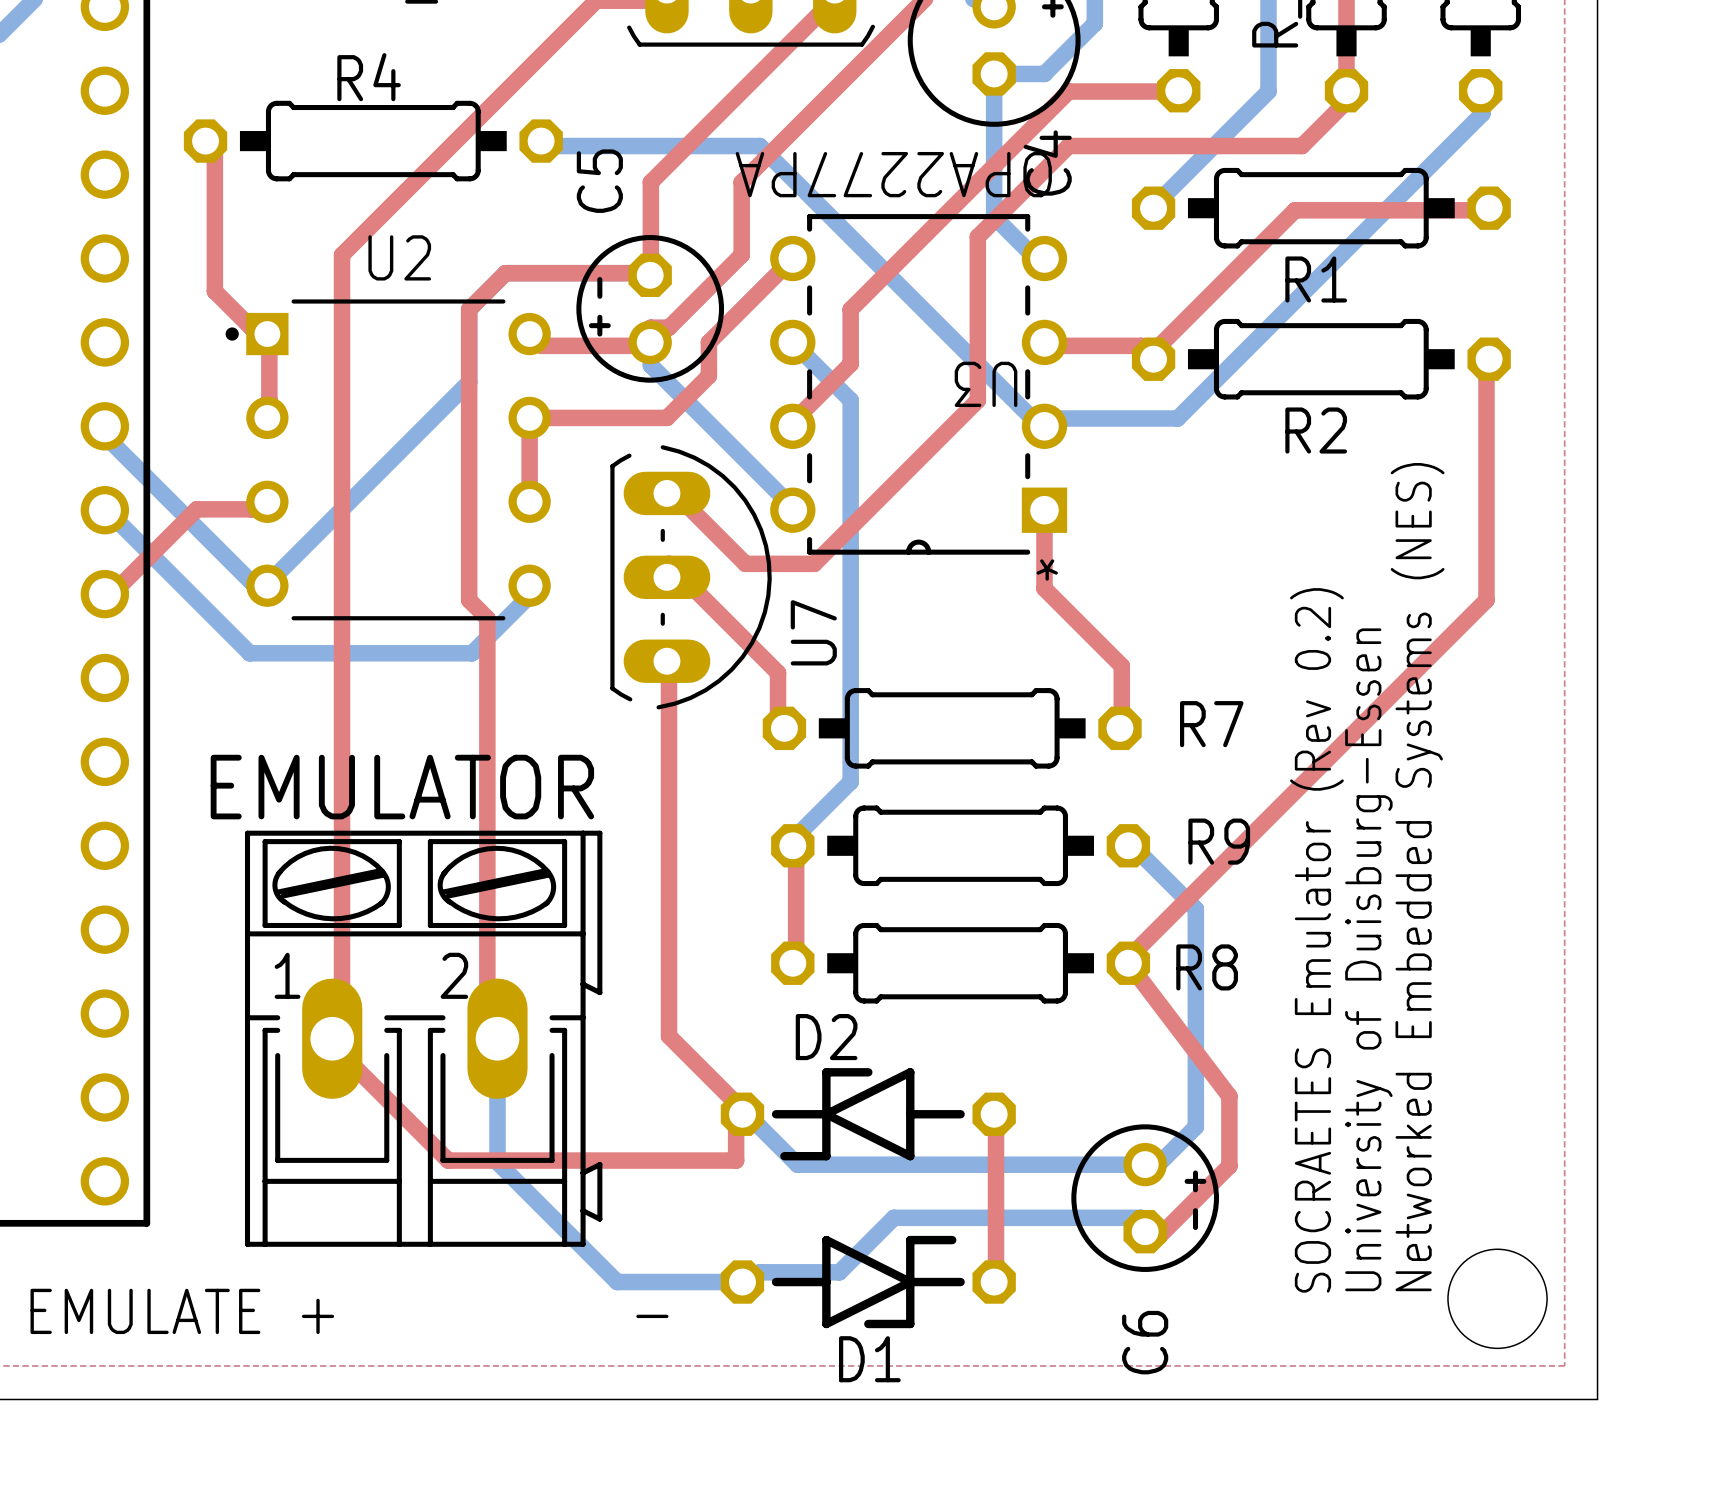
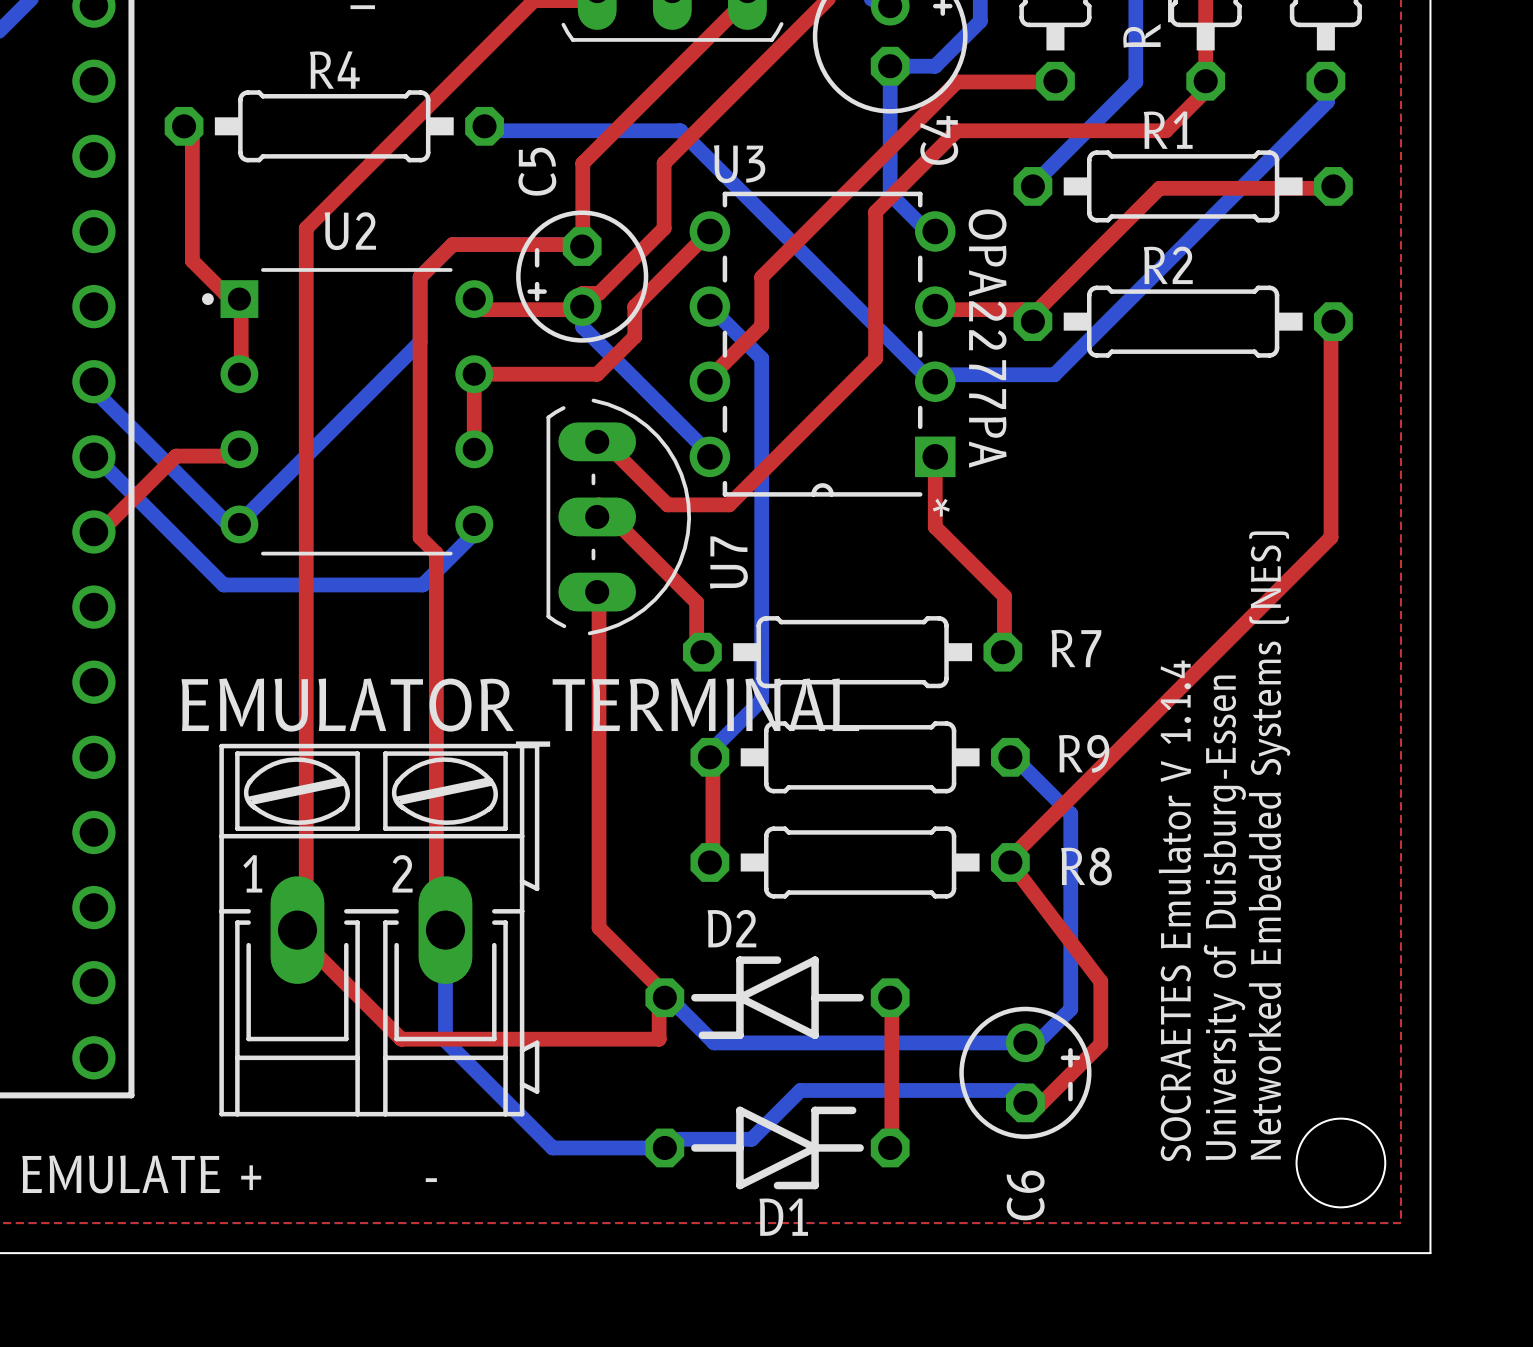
U3 value rotation: 0° (893, 174) -> 90° counterclockwise (987, 338)
R1 name position: R1 (1316, 279) -> R1 (1168, 130)
U3 name rotation: 0° (986, 384) -> 180° (739, 164)
U3 name position: U3 (986, 384) -> U3 (739, 164)
R2 name position: R2 (1316, 430) -> R2 (1168, 265)
EMULATOR name: EMULATOR (402, 787) -> EMULATOR_TERMINAL (520, 712)
text: SOCRAETES Emulator (Rev 0.2) (1316, 940) -> SOCRAETES Emulator V 1.1.4 (1174, 910)

